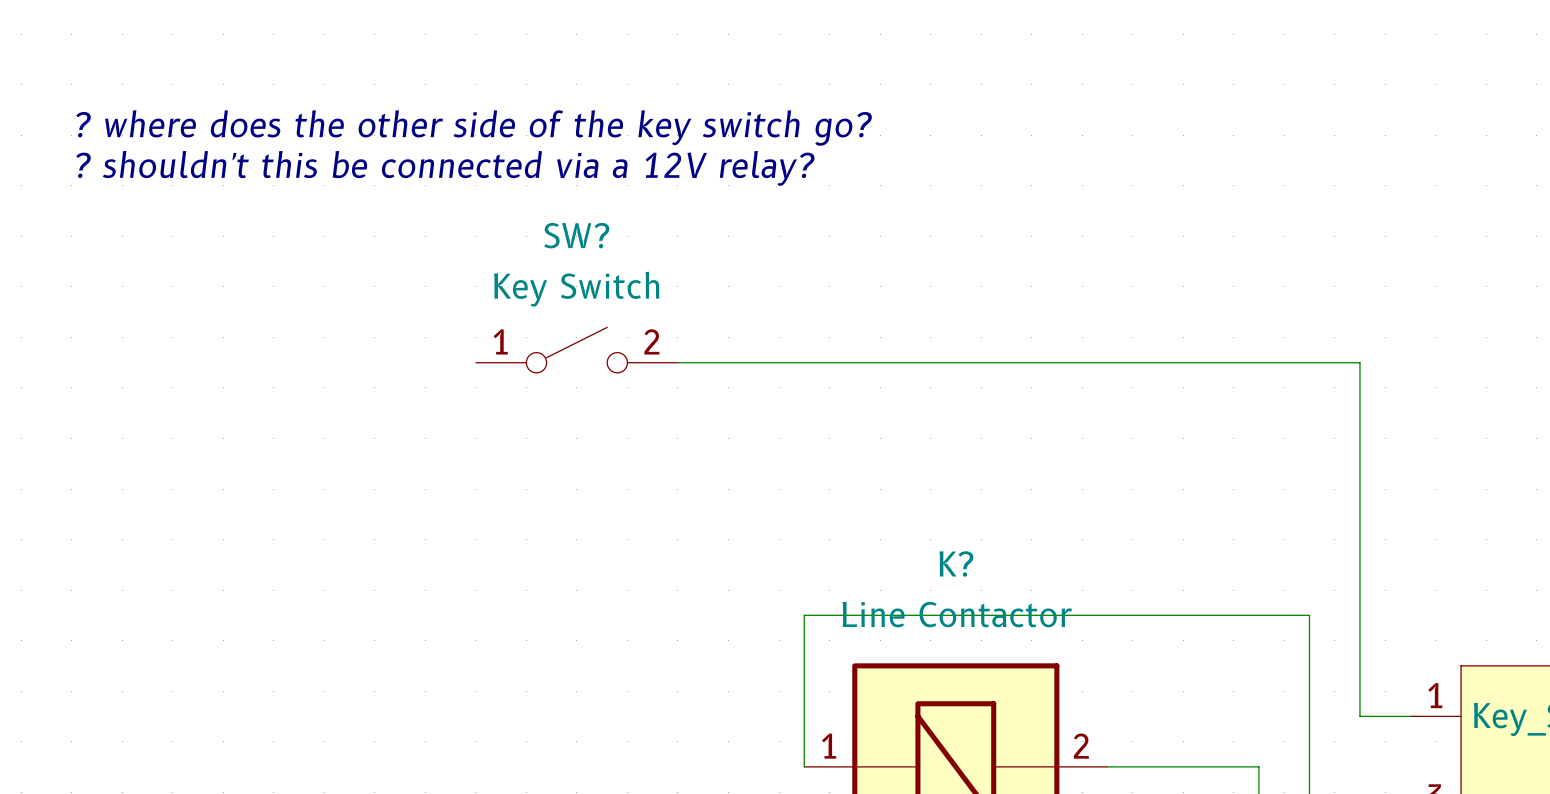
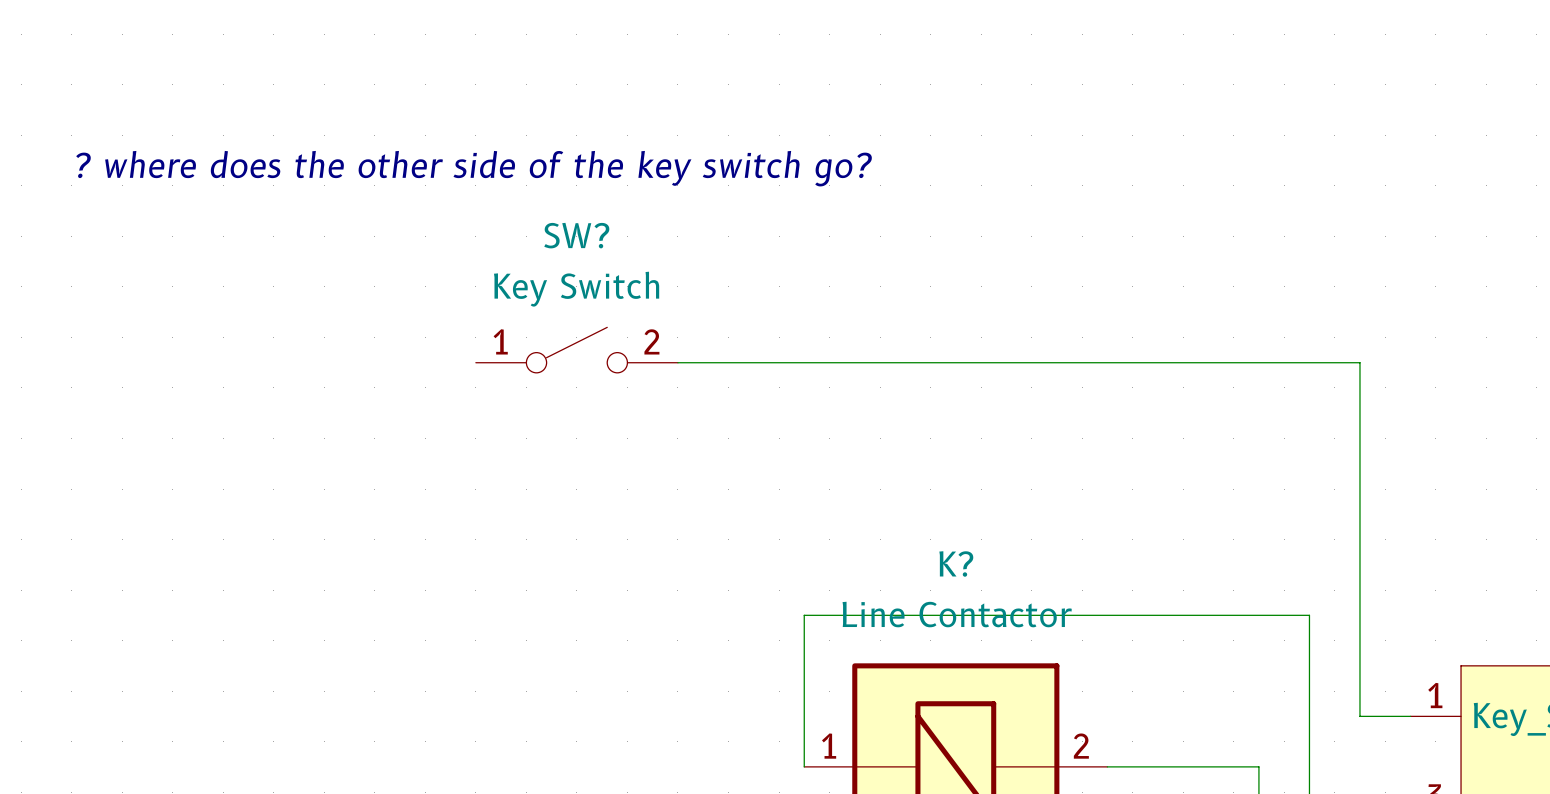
text: ? where does the other side of the key switch go? (474, 128) -> none
text: ? shouldn't this be connected via a 12V relay? (445, 168) -> ? where does the other side of the key switch go? (474, 168)

